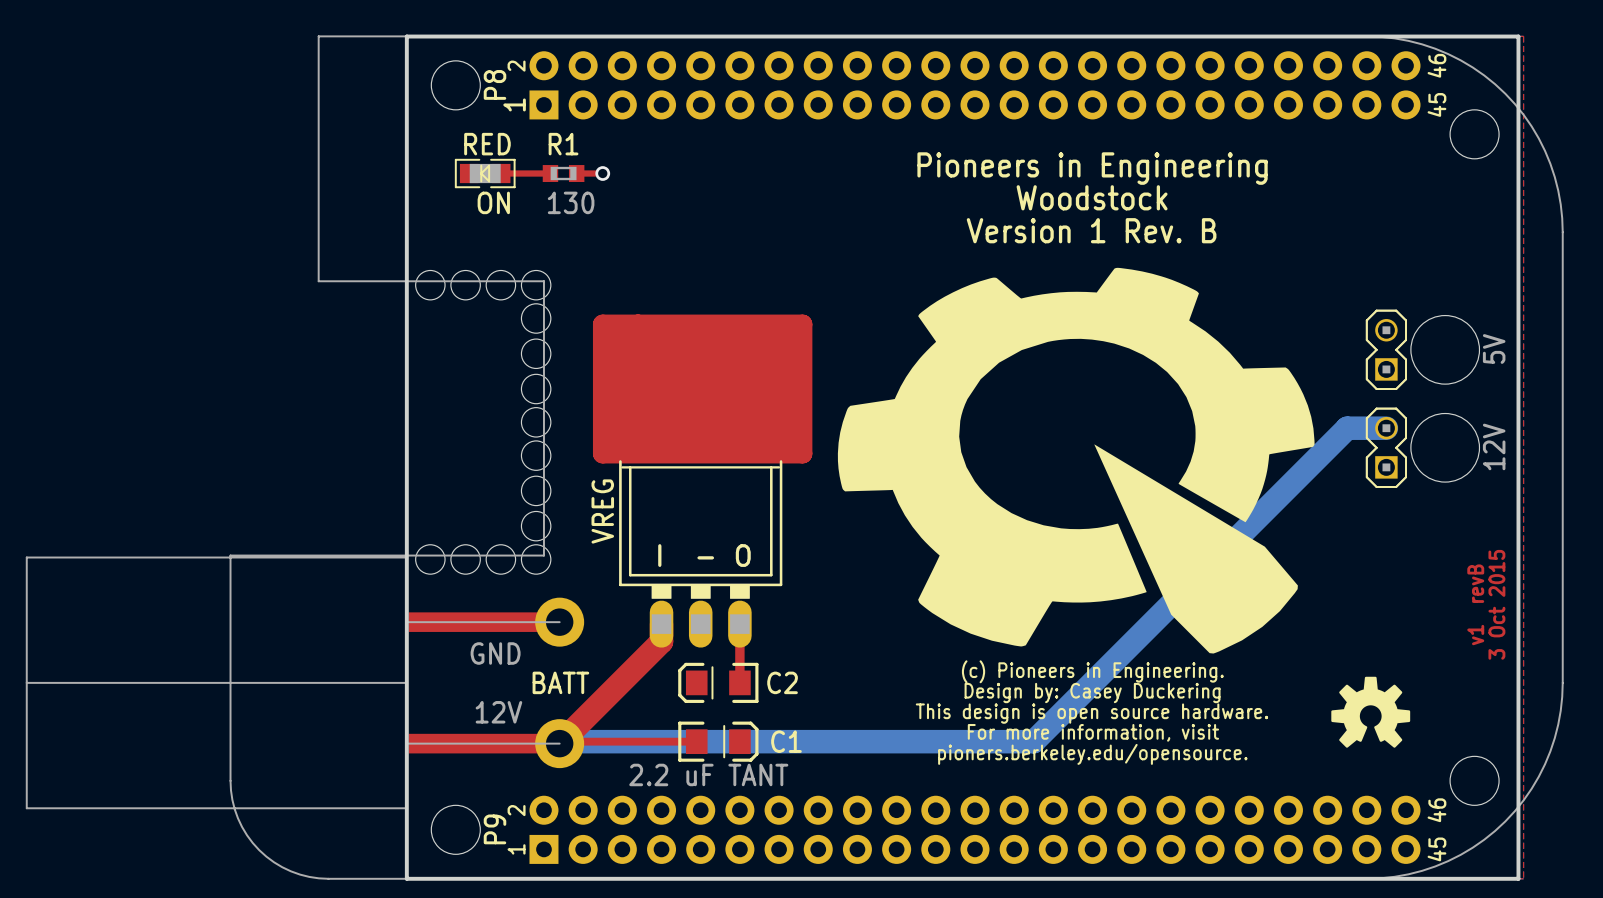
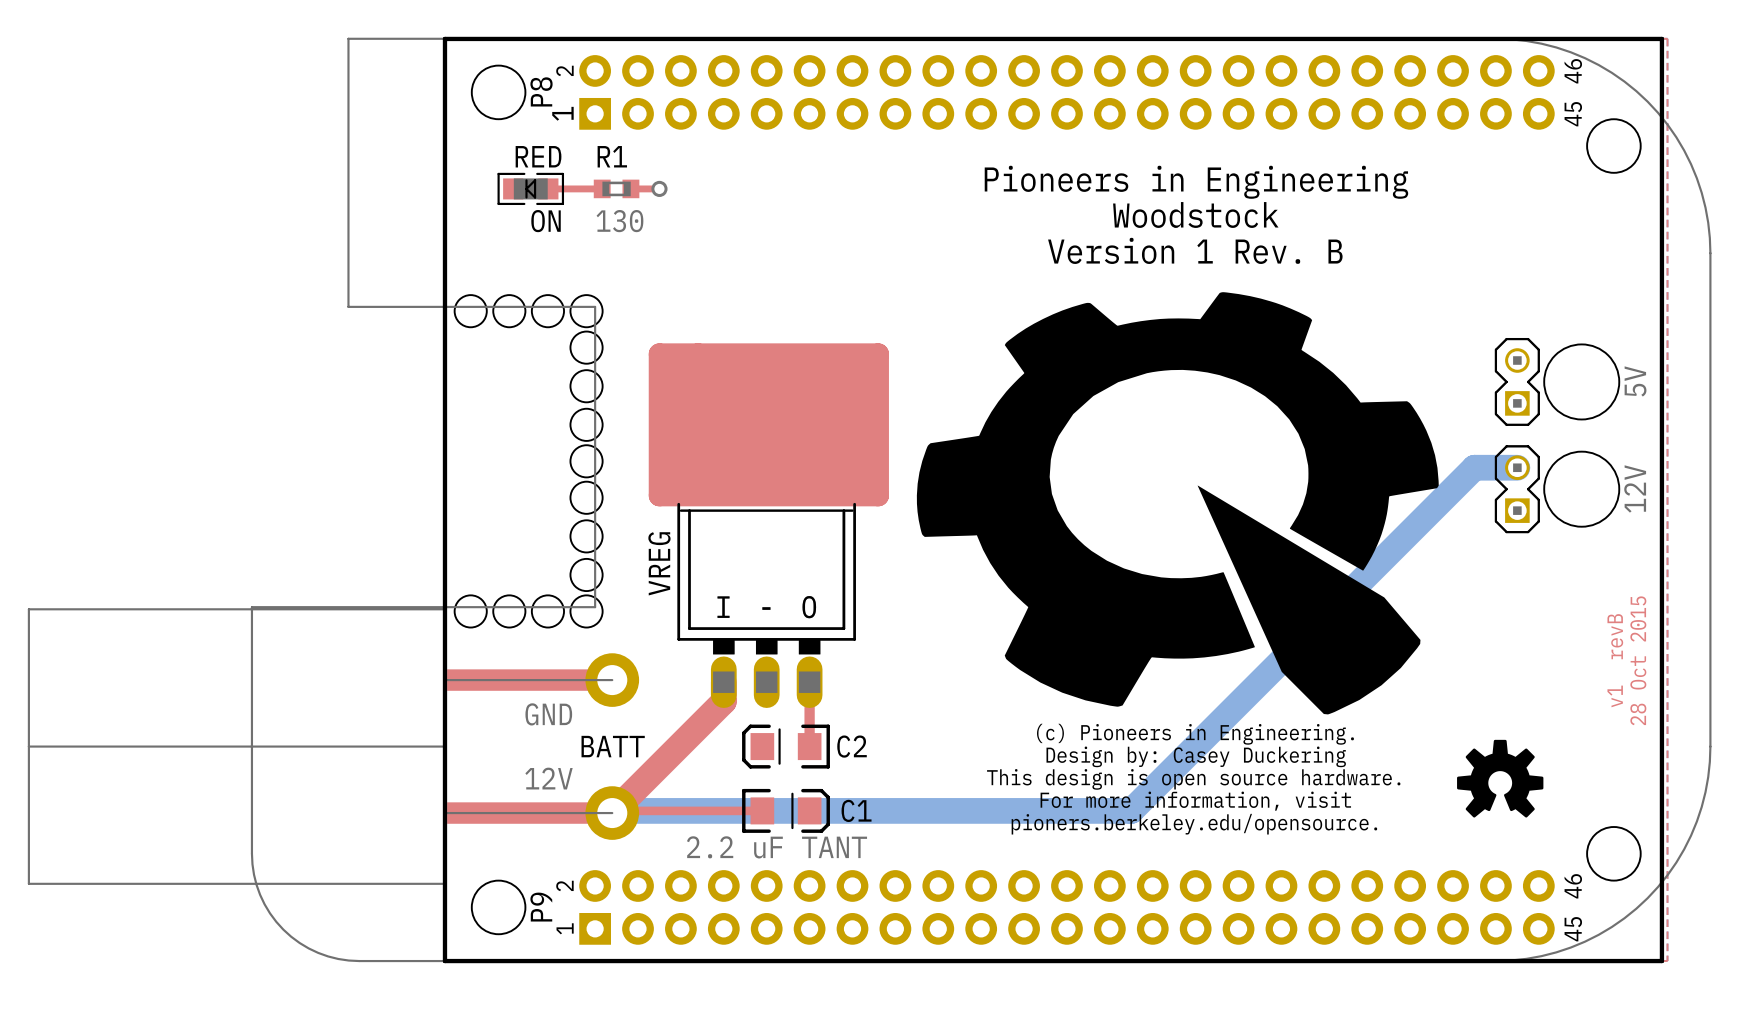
text: 3 Oct 2015 (1496, 604) -> 28 Oct 2015 (1638, 660)

